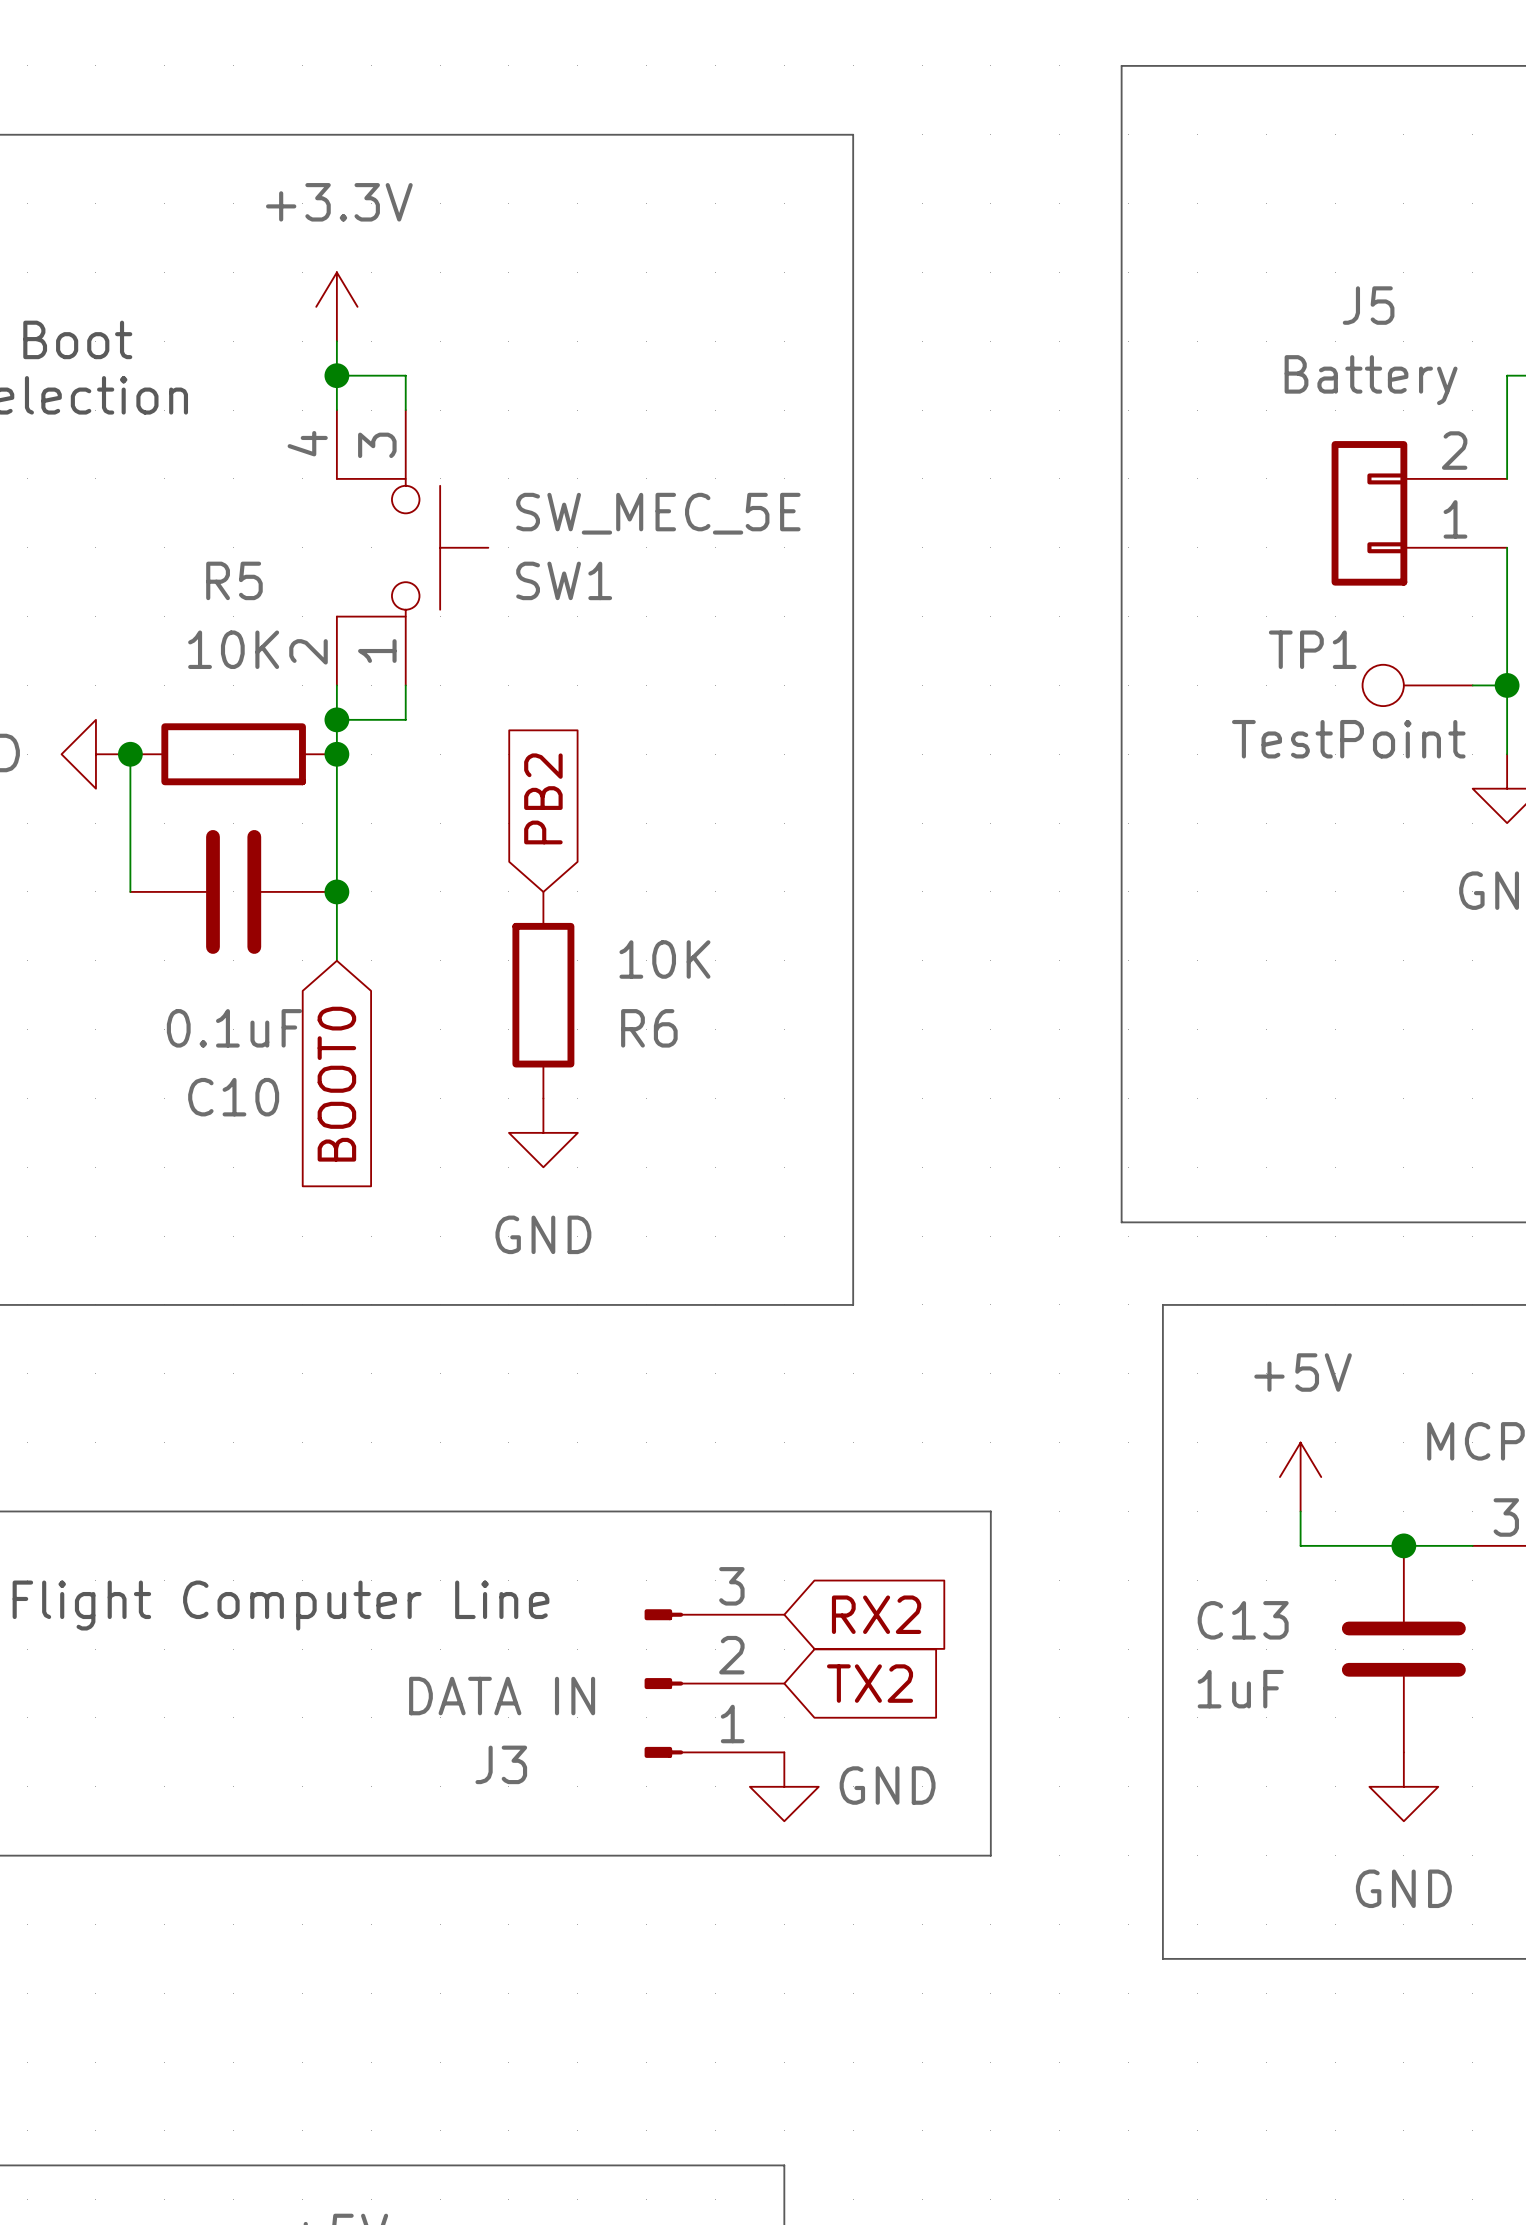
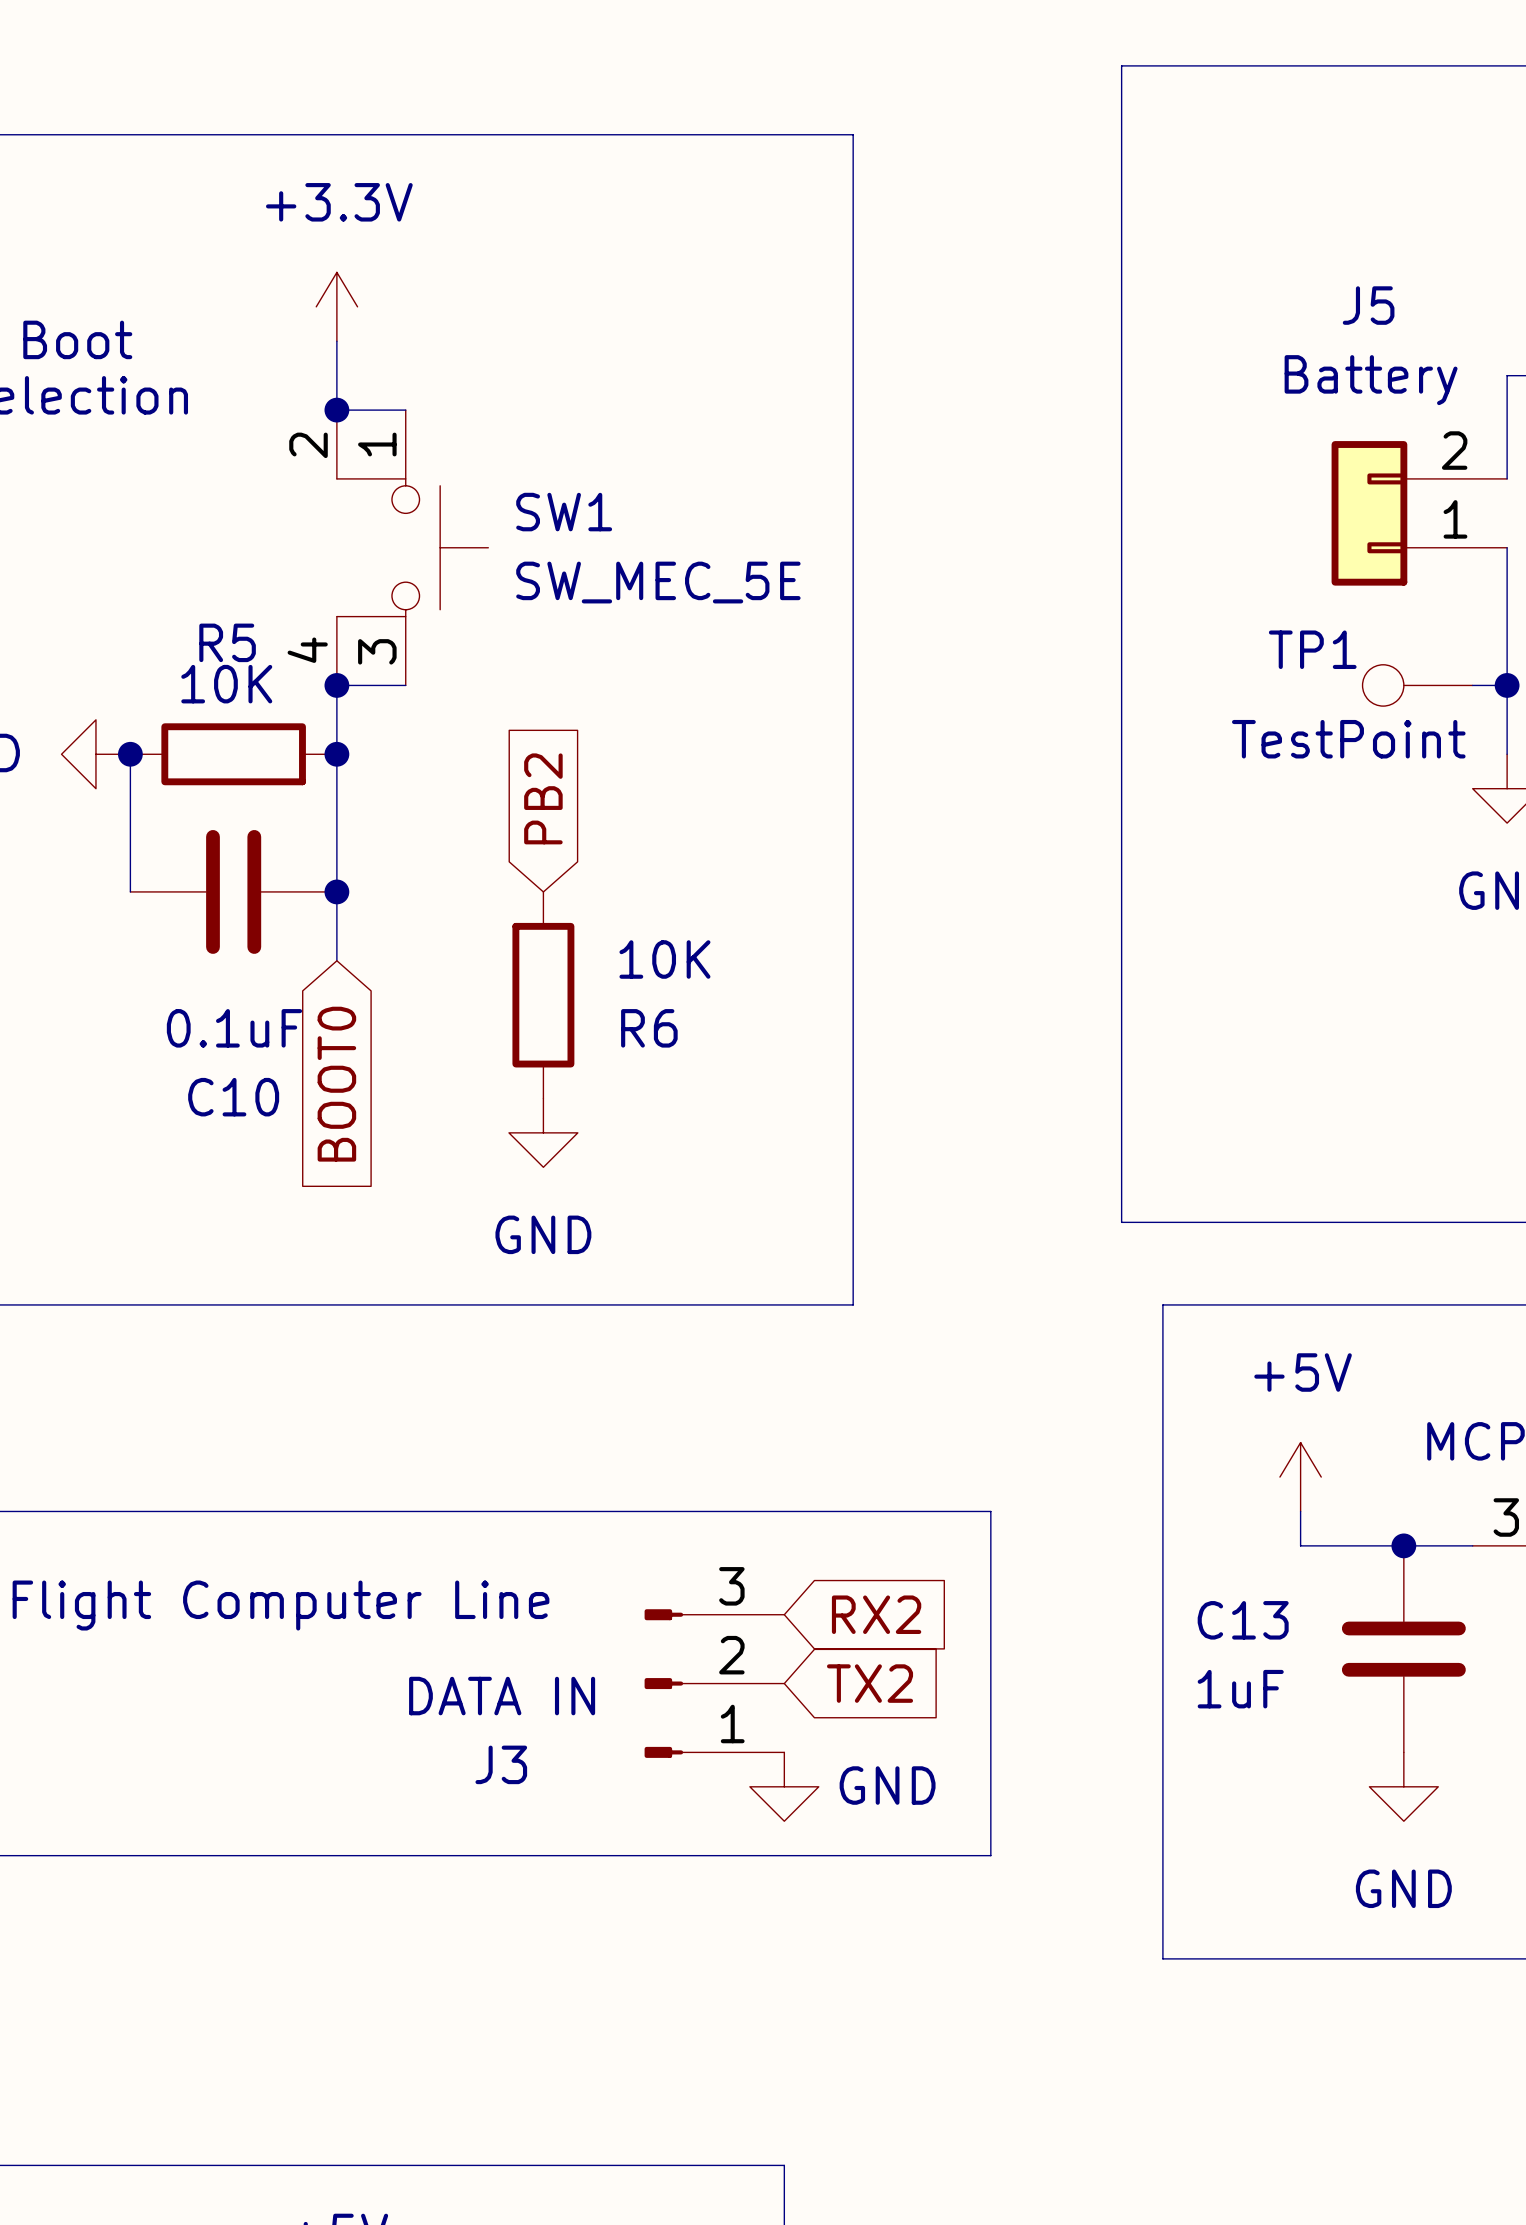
wire: (336, 375) (405, 375) (405, 410) -> (336, 410) (405, 410)
junction position: (336, 375) -> (336, 410)
SW1 flip: as is (412, 547) -> up-down (412, 547)
R5 name position: R5 (234, 580) -> R5 (227, 642)
R5 value position: 10K (233, 649) -> 10K (226, 684)
wire: (405, 685) (405, 719) (336, 719) -> (405, 685) (336, 685)
junction position: (336, 719) -> (336, 685)

